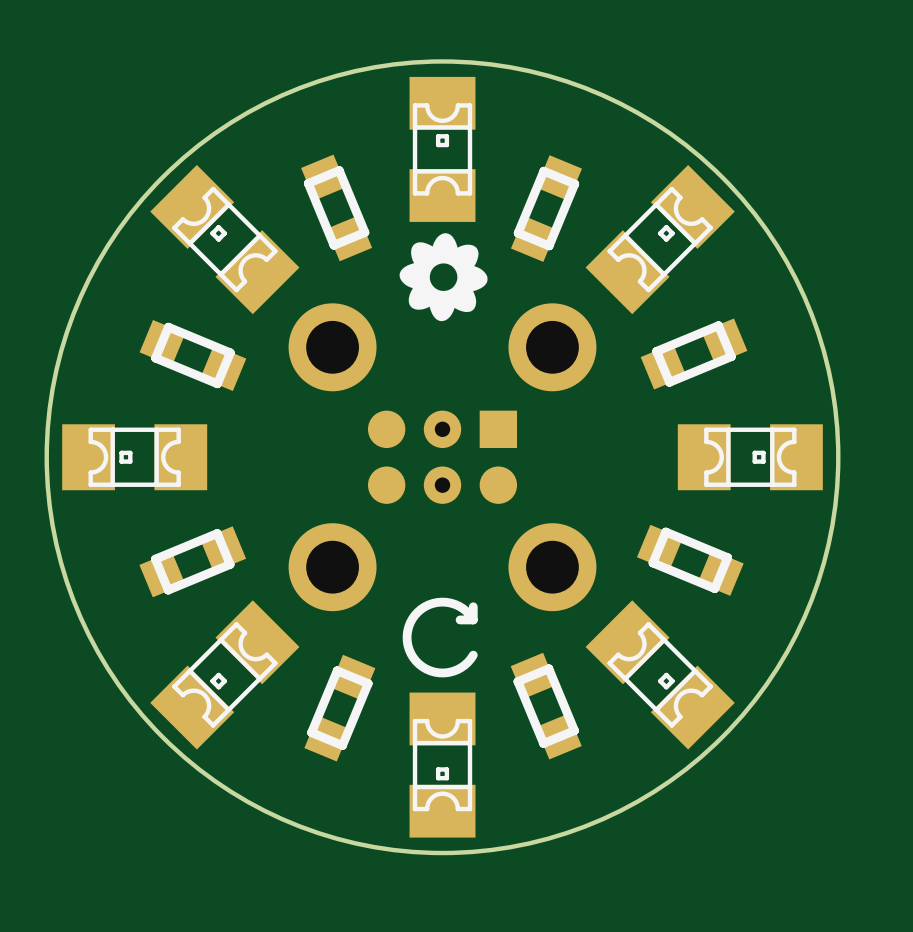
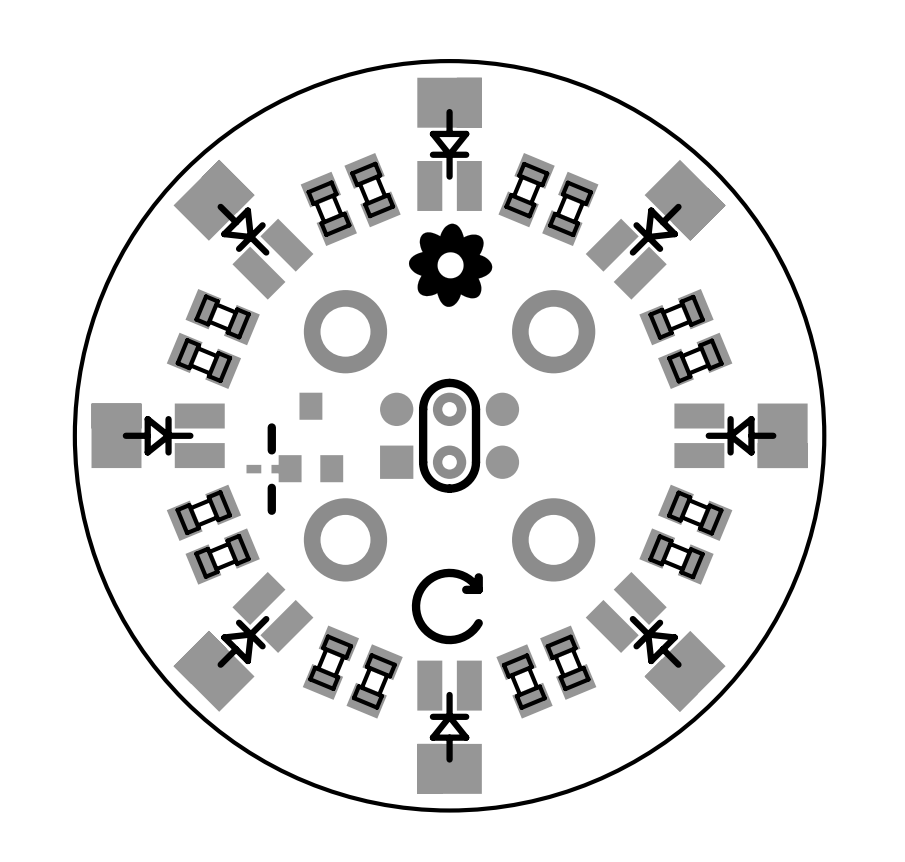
part footprint: [409, 76, 476, 222] -> [417, 77, 482, 211]
part footprint: [150, 164, 300, 315] -> [173, 159, 314, 300]
part footprint: [585, 164, 735, 315] -> [585, 159, 726, 300]
part: none -> (372, 190)
part: none -> (526, 190)
part: (336, 207) -> none
part: (546, 208) -> none
part: none -> (328, 208)
part: none -> (570, 208)
part: none -> (222, 317)
part: none -> (676, 317)
part: (694, 353) -> none
part: (192, 355) -> none
part: none -> (203, 360)
part: none -> (695, 360)
part footprint: [367, 410, 518, 504] -> [380, 378, 520, 493]
part footprint: [62, 424, 208, 491] -> [91, 403, 225, 469]
part footprint: [677, 424, 823, 491] -> [674, 403, 808, 469]
line: none -> (271, 427) (271, 450)
part: none -> (310, 437)
part: none -> (266, 469)
line: none -> (271, 487) (271, 510)
part: none -> (203, 512)
part: none -> (695, 512)
part: (690, 560) -> none
part: (192, 561) -> none
part: none -> (222, 556)
part: none -> (676, 556)
part footprint: [150, 600, 300, 750] -> [173, 571, 314, 712]
part footprint: [585, 600, 735, 750] -> [585, 571, 726, 712]
part footprint: [409, 692, 476, 838] -> [417, 660, 482, 794]
part: none -> (330, 662)
part: none -> (568, 662)
part: (546, 706) -> none
part: (339, 708) -> none
part: none -> (374, 681)
part: none -> (524, 681)

